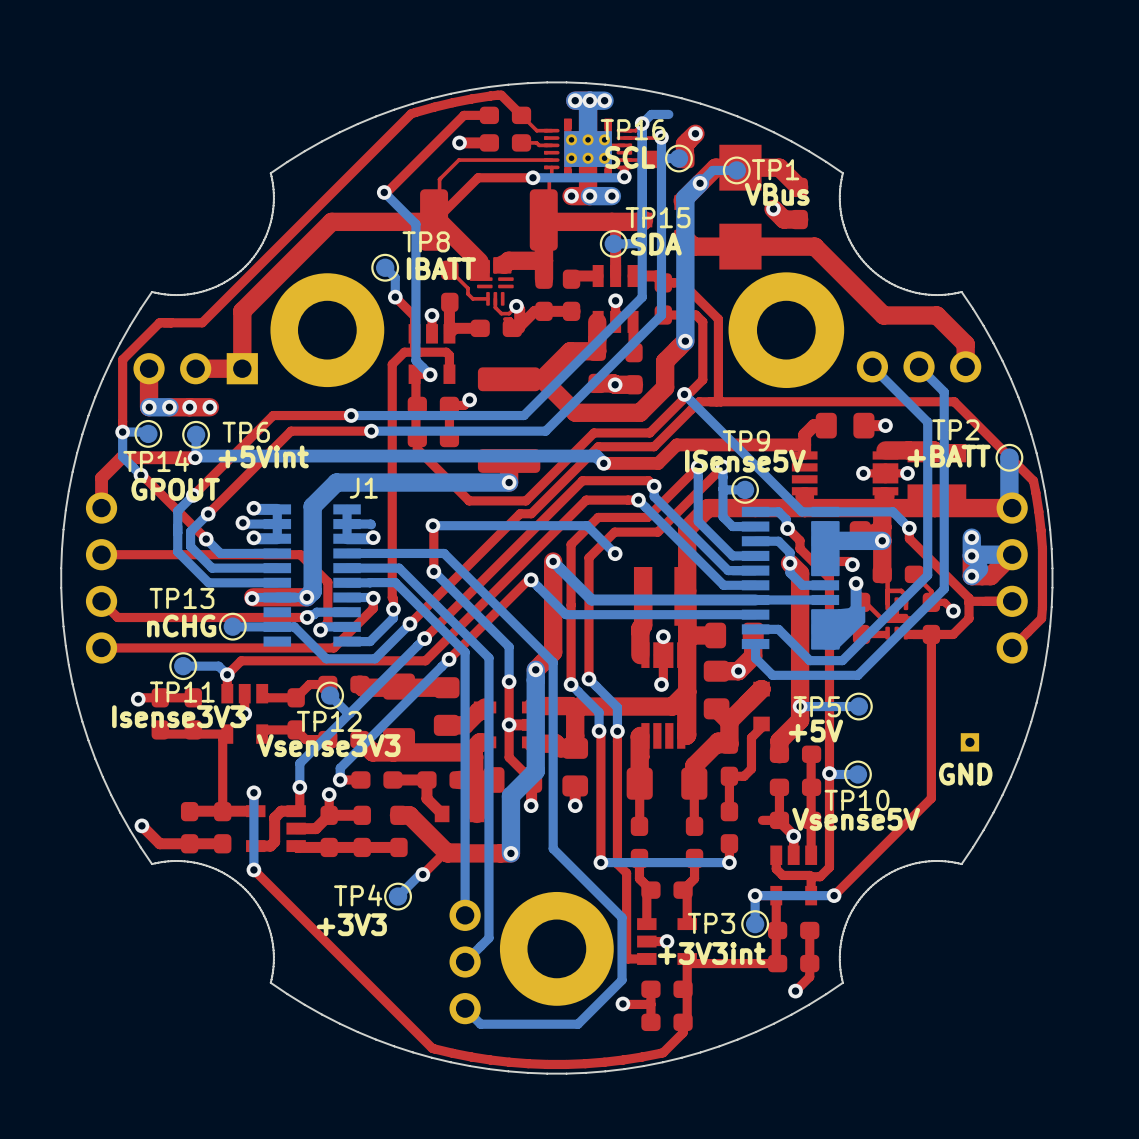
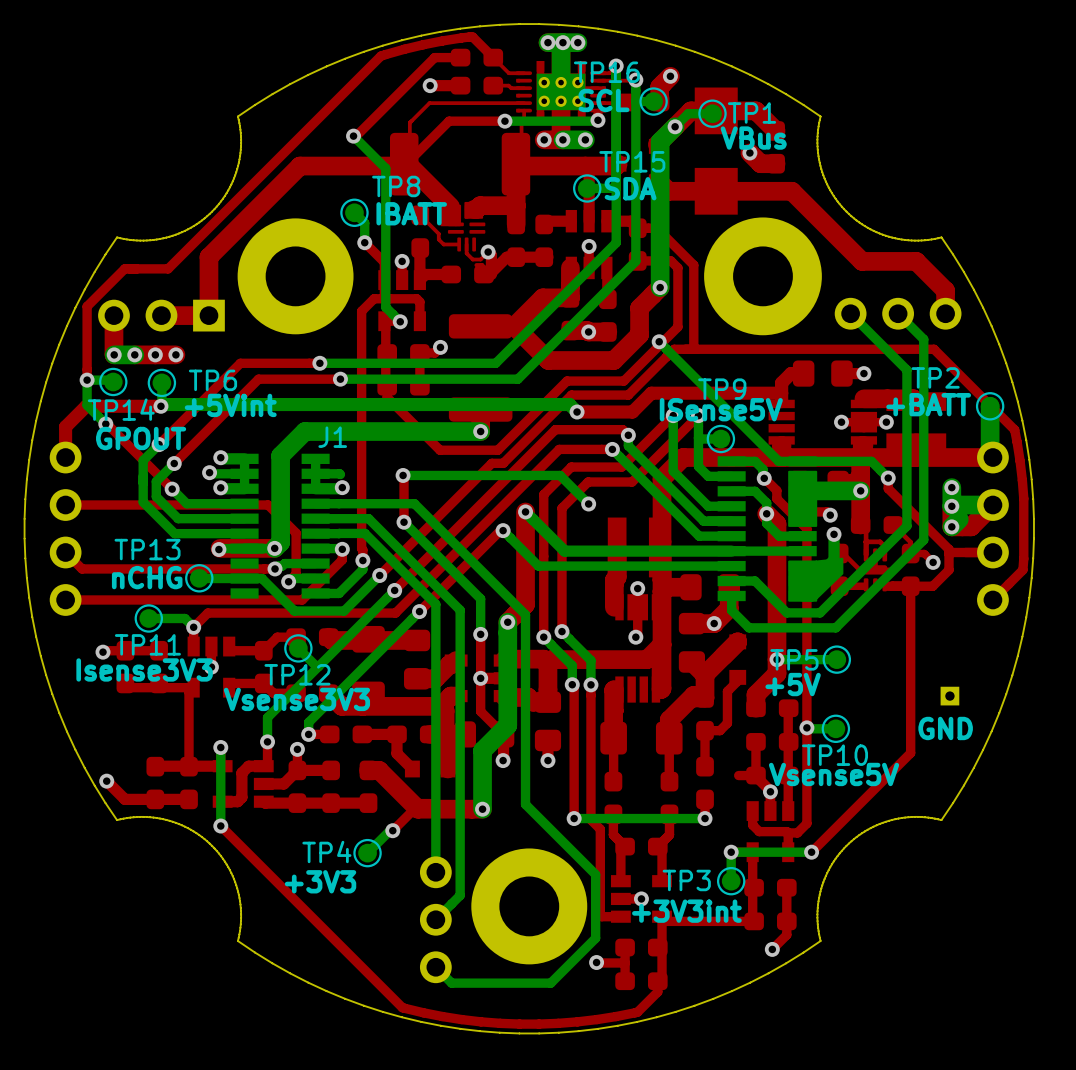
bottom track: (668, 114) (651, 114) (642, 123) -> none

